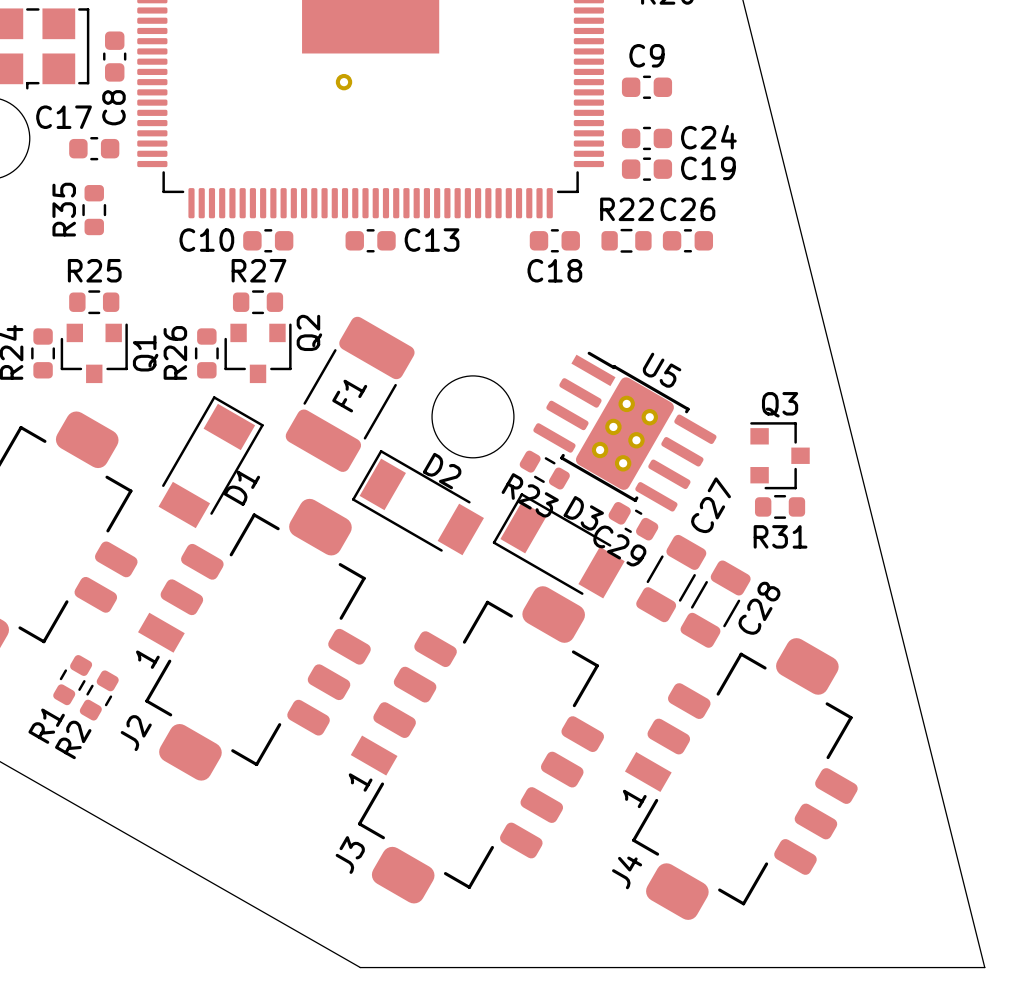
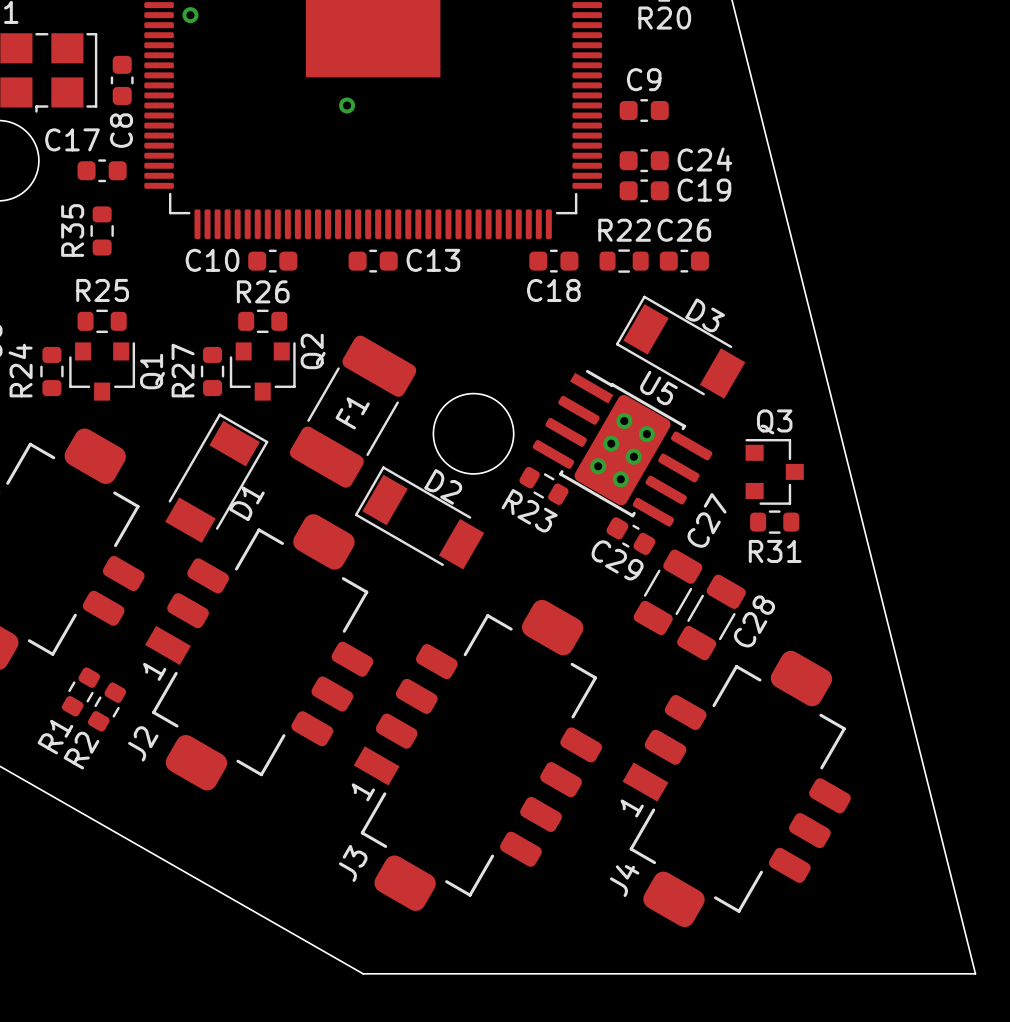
R27 name: R27 (259, 270) -> R26 (263, 291)
R26 name: R26 (175, 352) -> R27 (183, 370)
D3 position: (558, 545) -> (680, 347)

